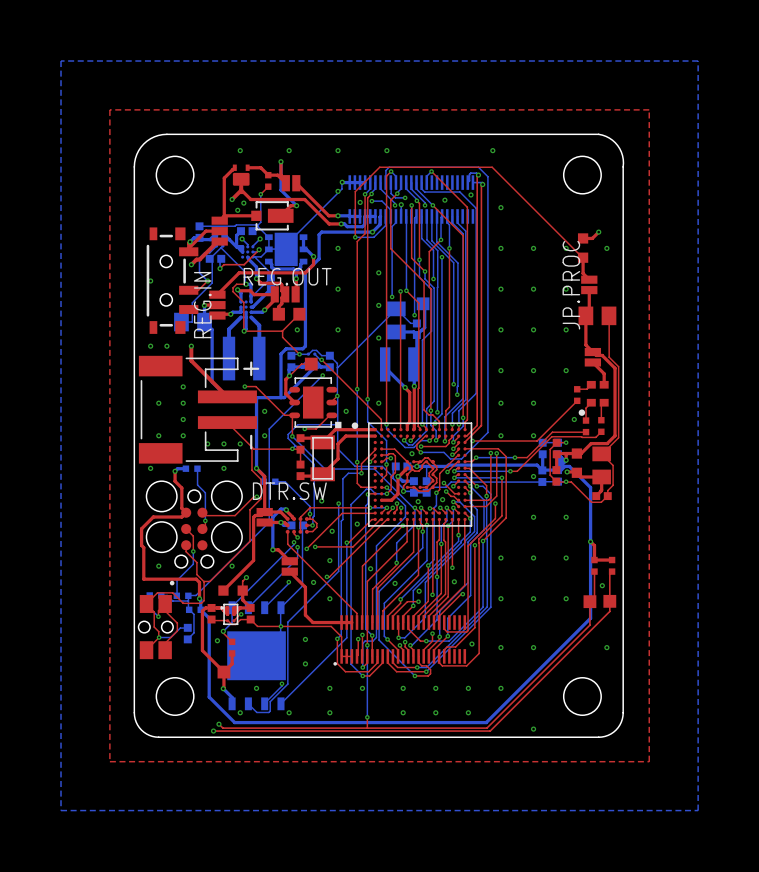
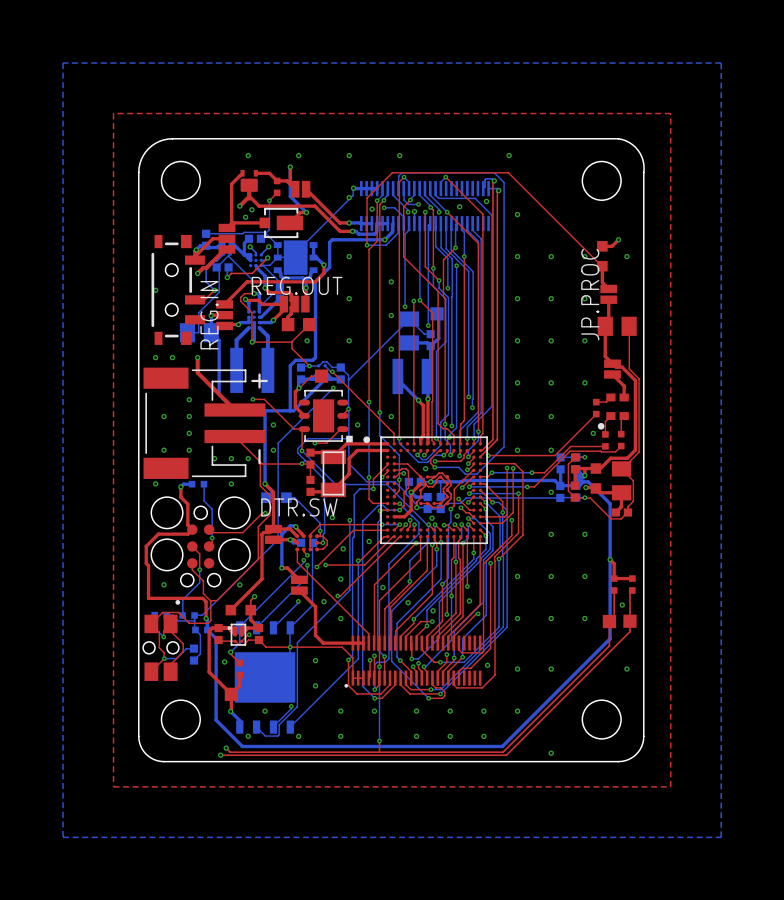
part footprint: [260, 478, 279, 485] -> [261, 492, 292, 503]

